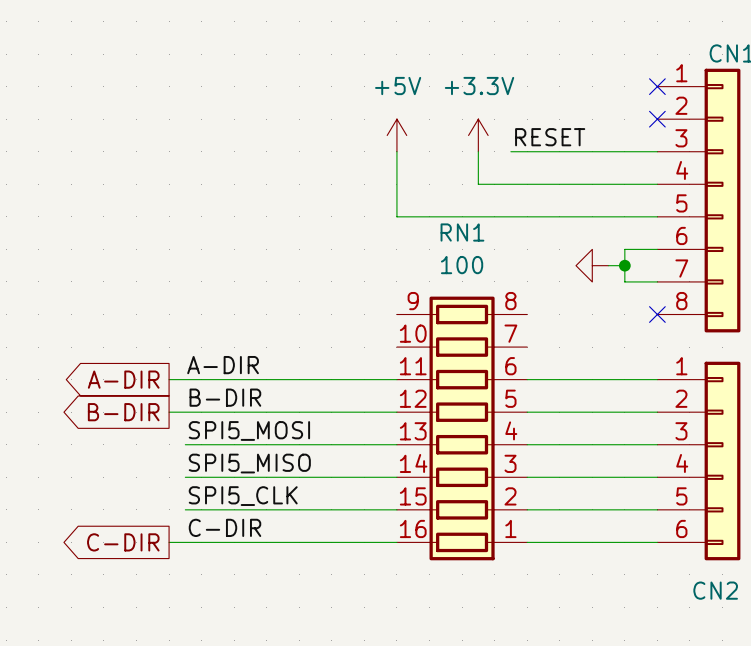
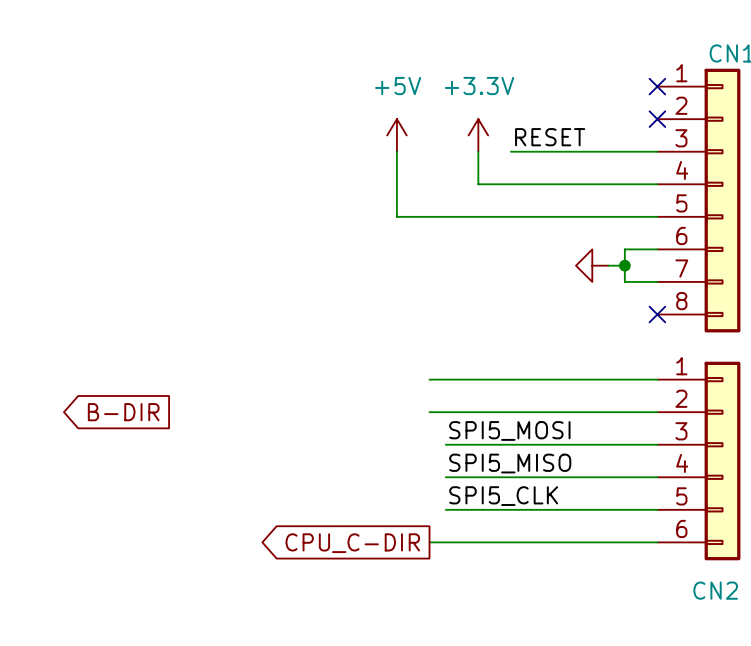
label: A-DIR (223, 365) -> none
global label: A-DIR (123, 379) -> none
wire: (169, 379) (396, 379) -> none
label: B-DIR (225, 397) -> none
wire: (169, 412) (396, 412) -> none
RN1: 100 (462, 428) -> none
label position: SPI5_MOSI (249, 430) -> SPI5_MOSI (509, 430)
wire: (185, 444) (396, 444) -> none
label position: SPI5_MISO (249, 463) -> SPI5_MISO (510, 463)
wire: (185, 477) (396, 477) -> none
label position: SPI5_CLK (243, 496) -> SPI5_CLK (503, 496)
wire: (185, 509) (396, 509) -> none
label: C-DIR (225, 527) -> none
global label: C-DIR (123, 542) -> none
wire: (169, 542) (396, 542) -> none
global label: none -> CPU_C-DIR (352, 543)

